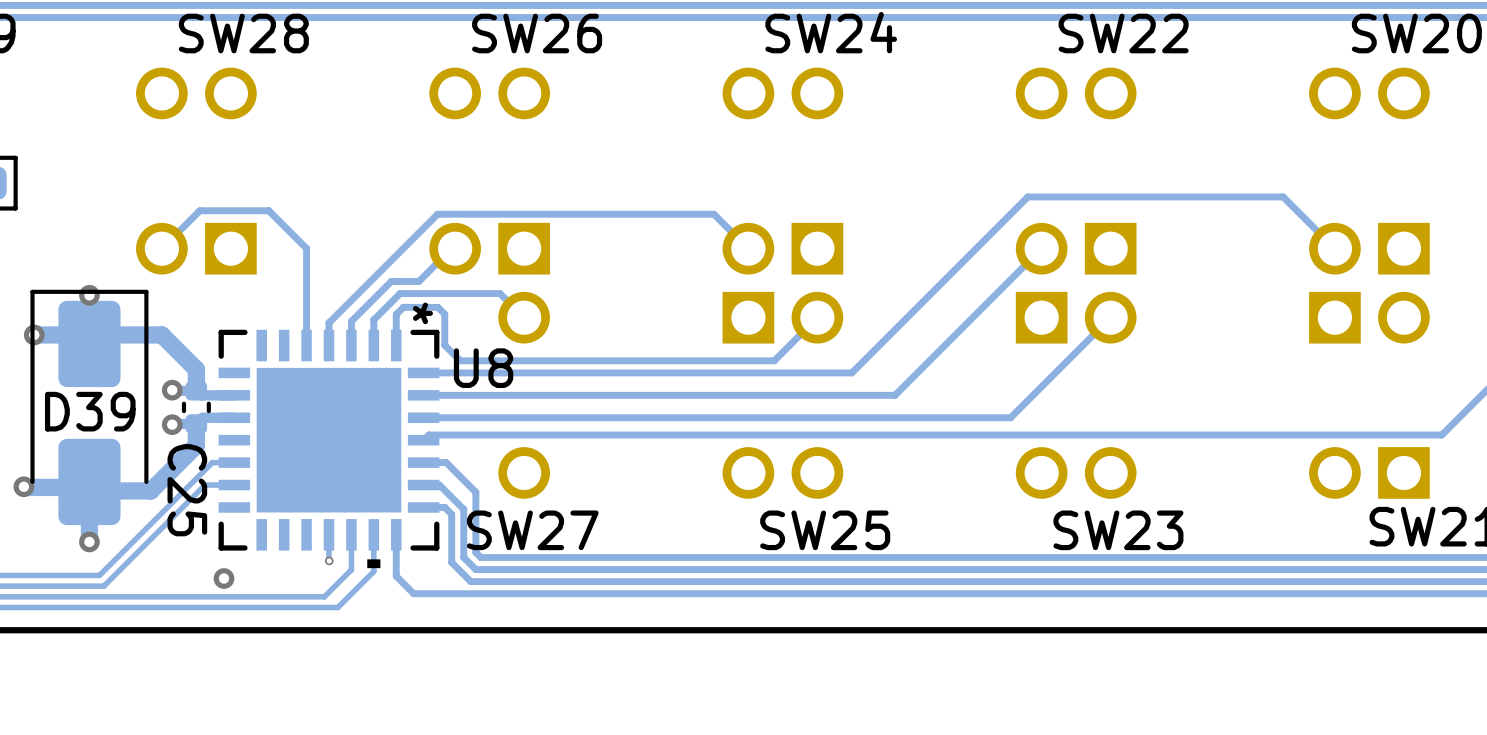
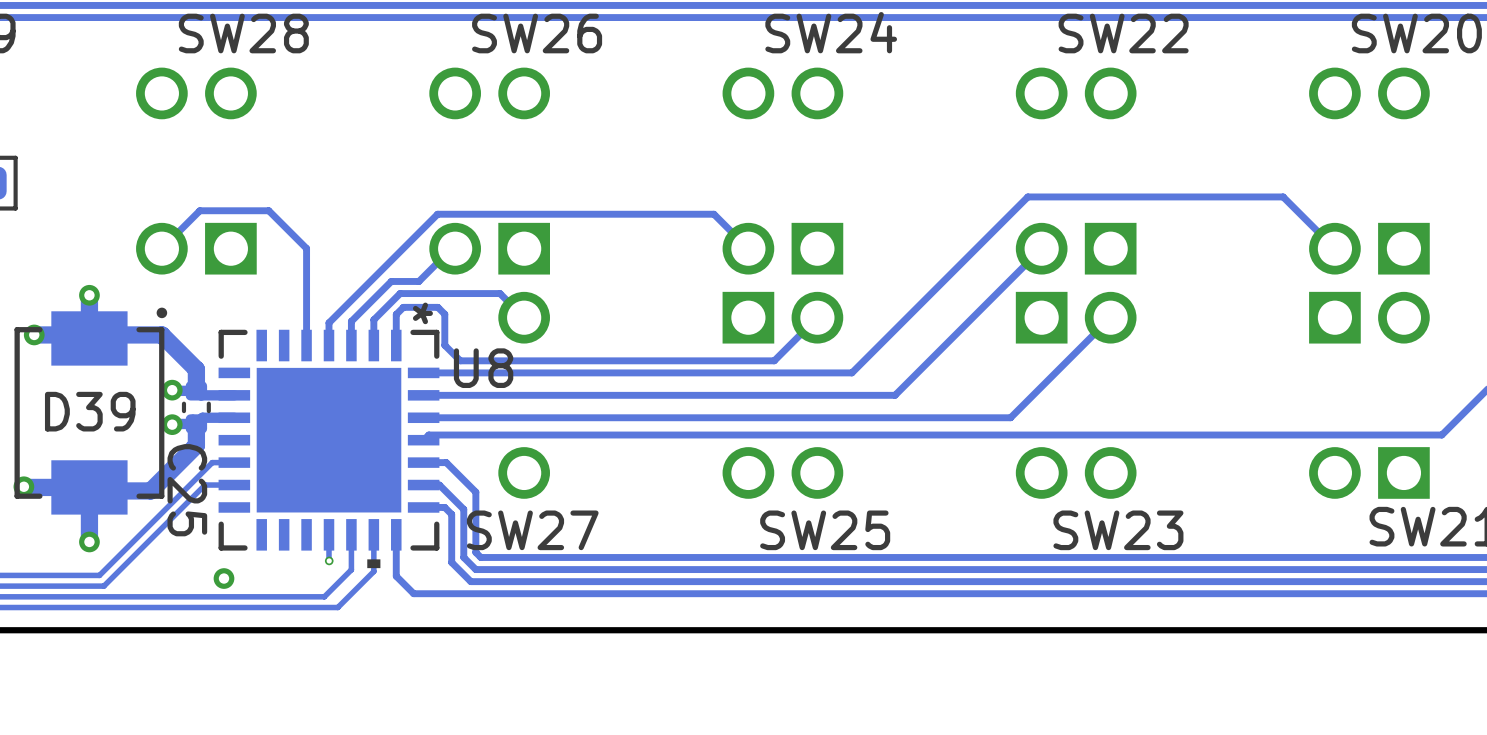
D39 footprint: [30, 289, 149, 526] -> [14, 307, 168, 515]

